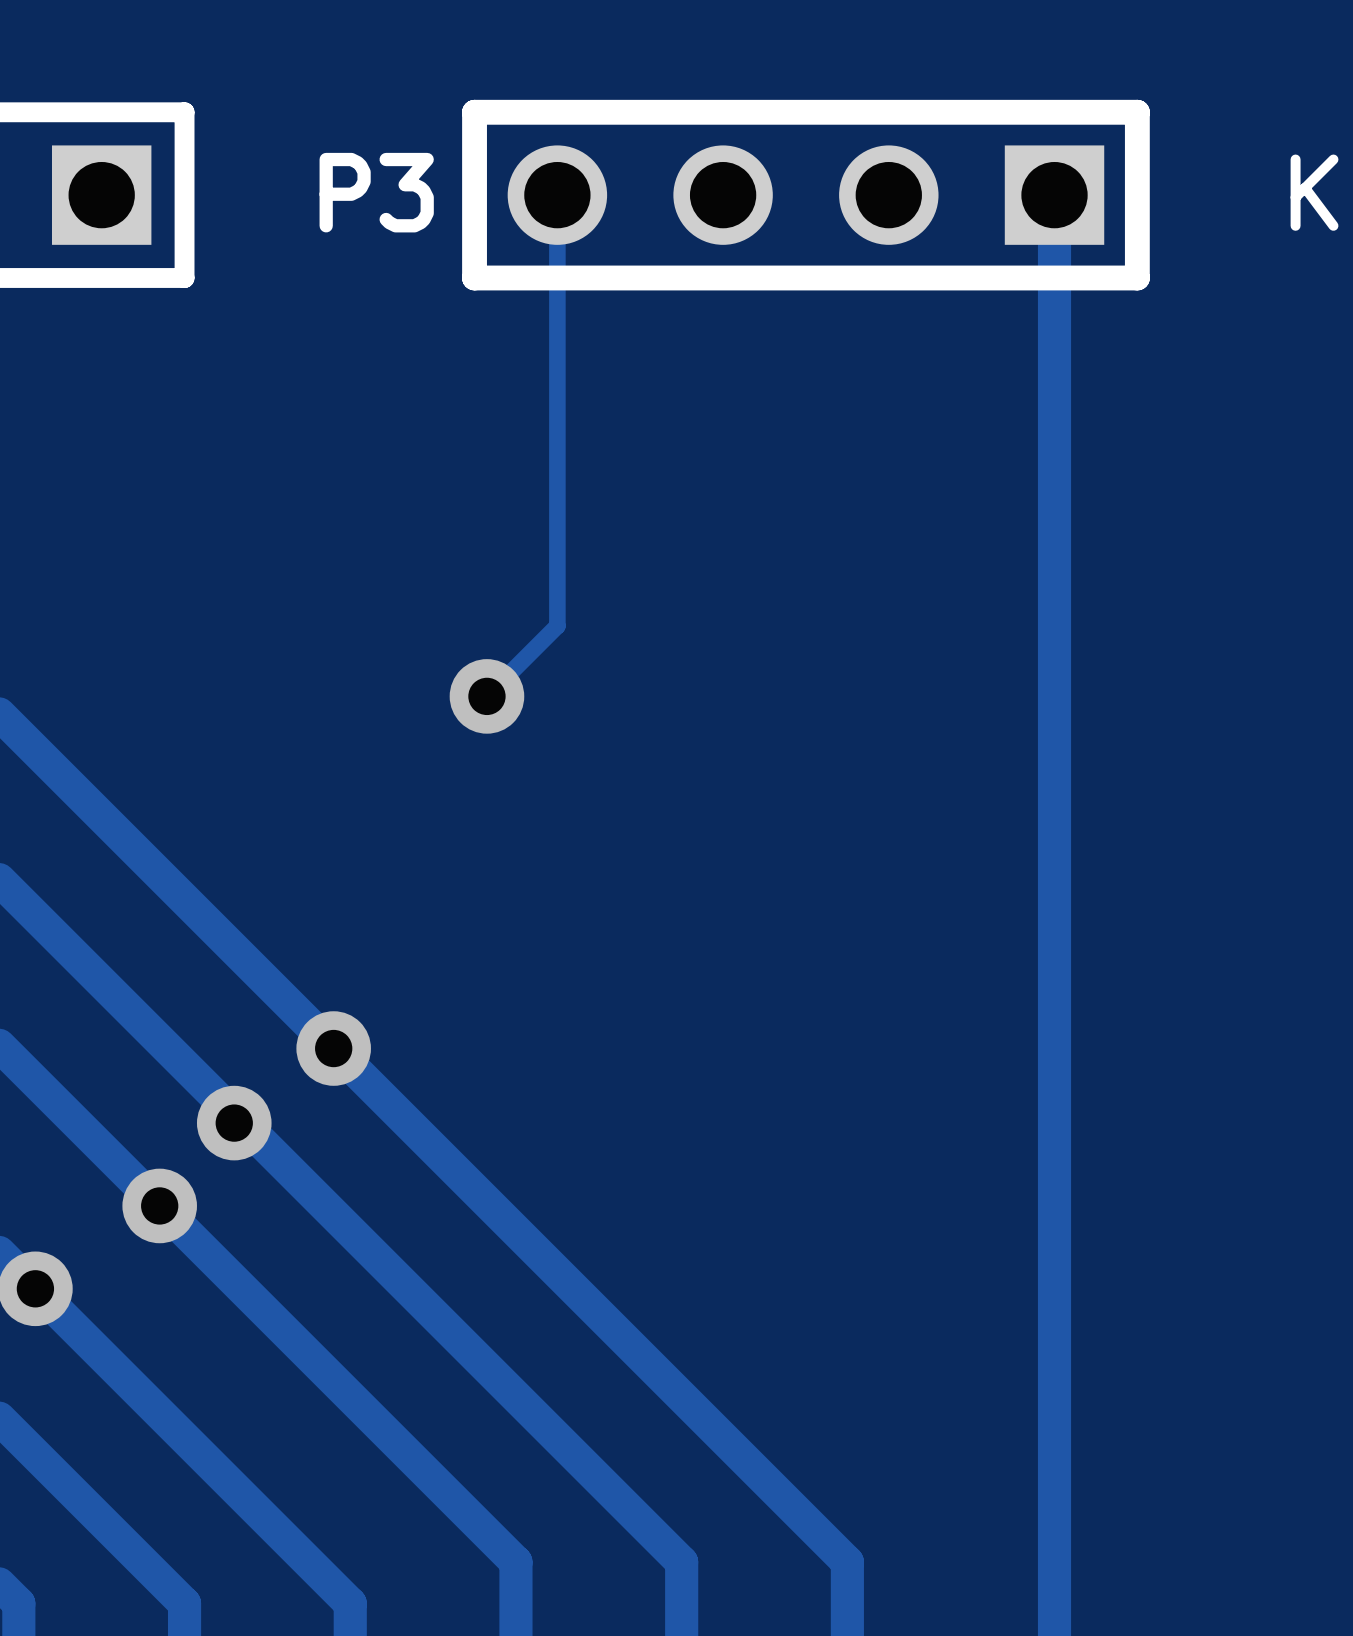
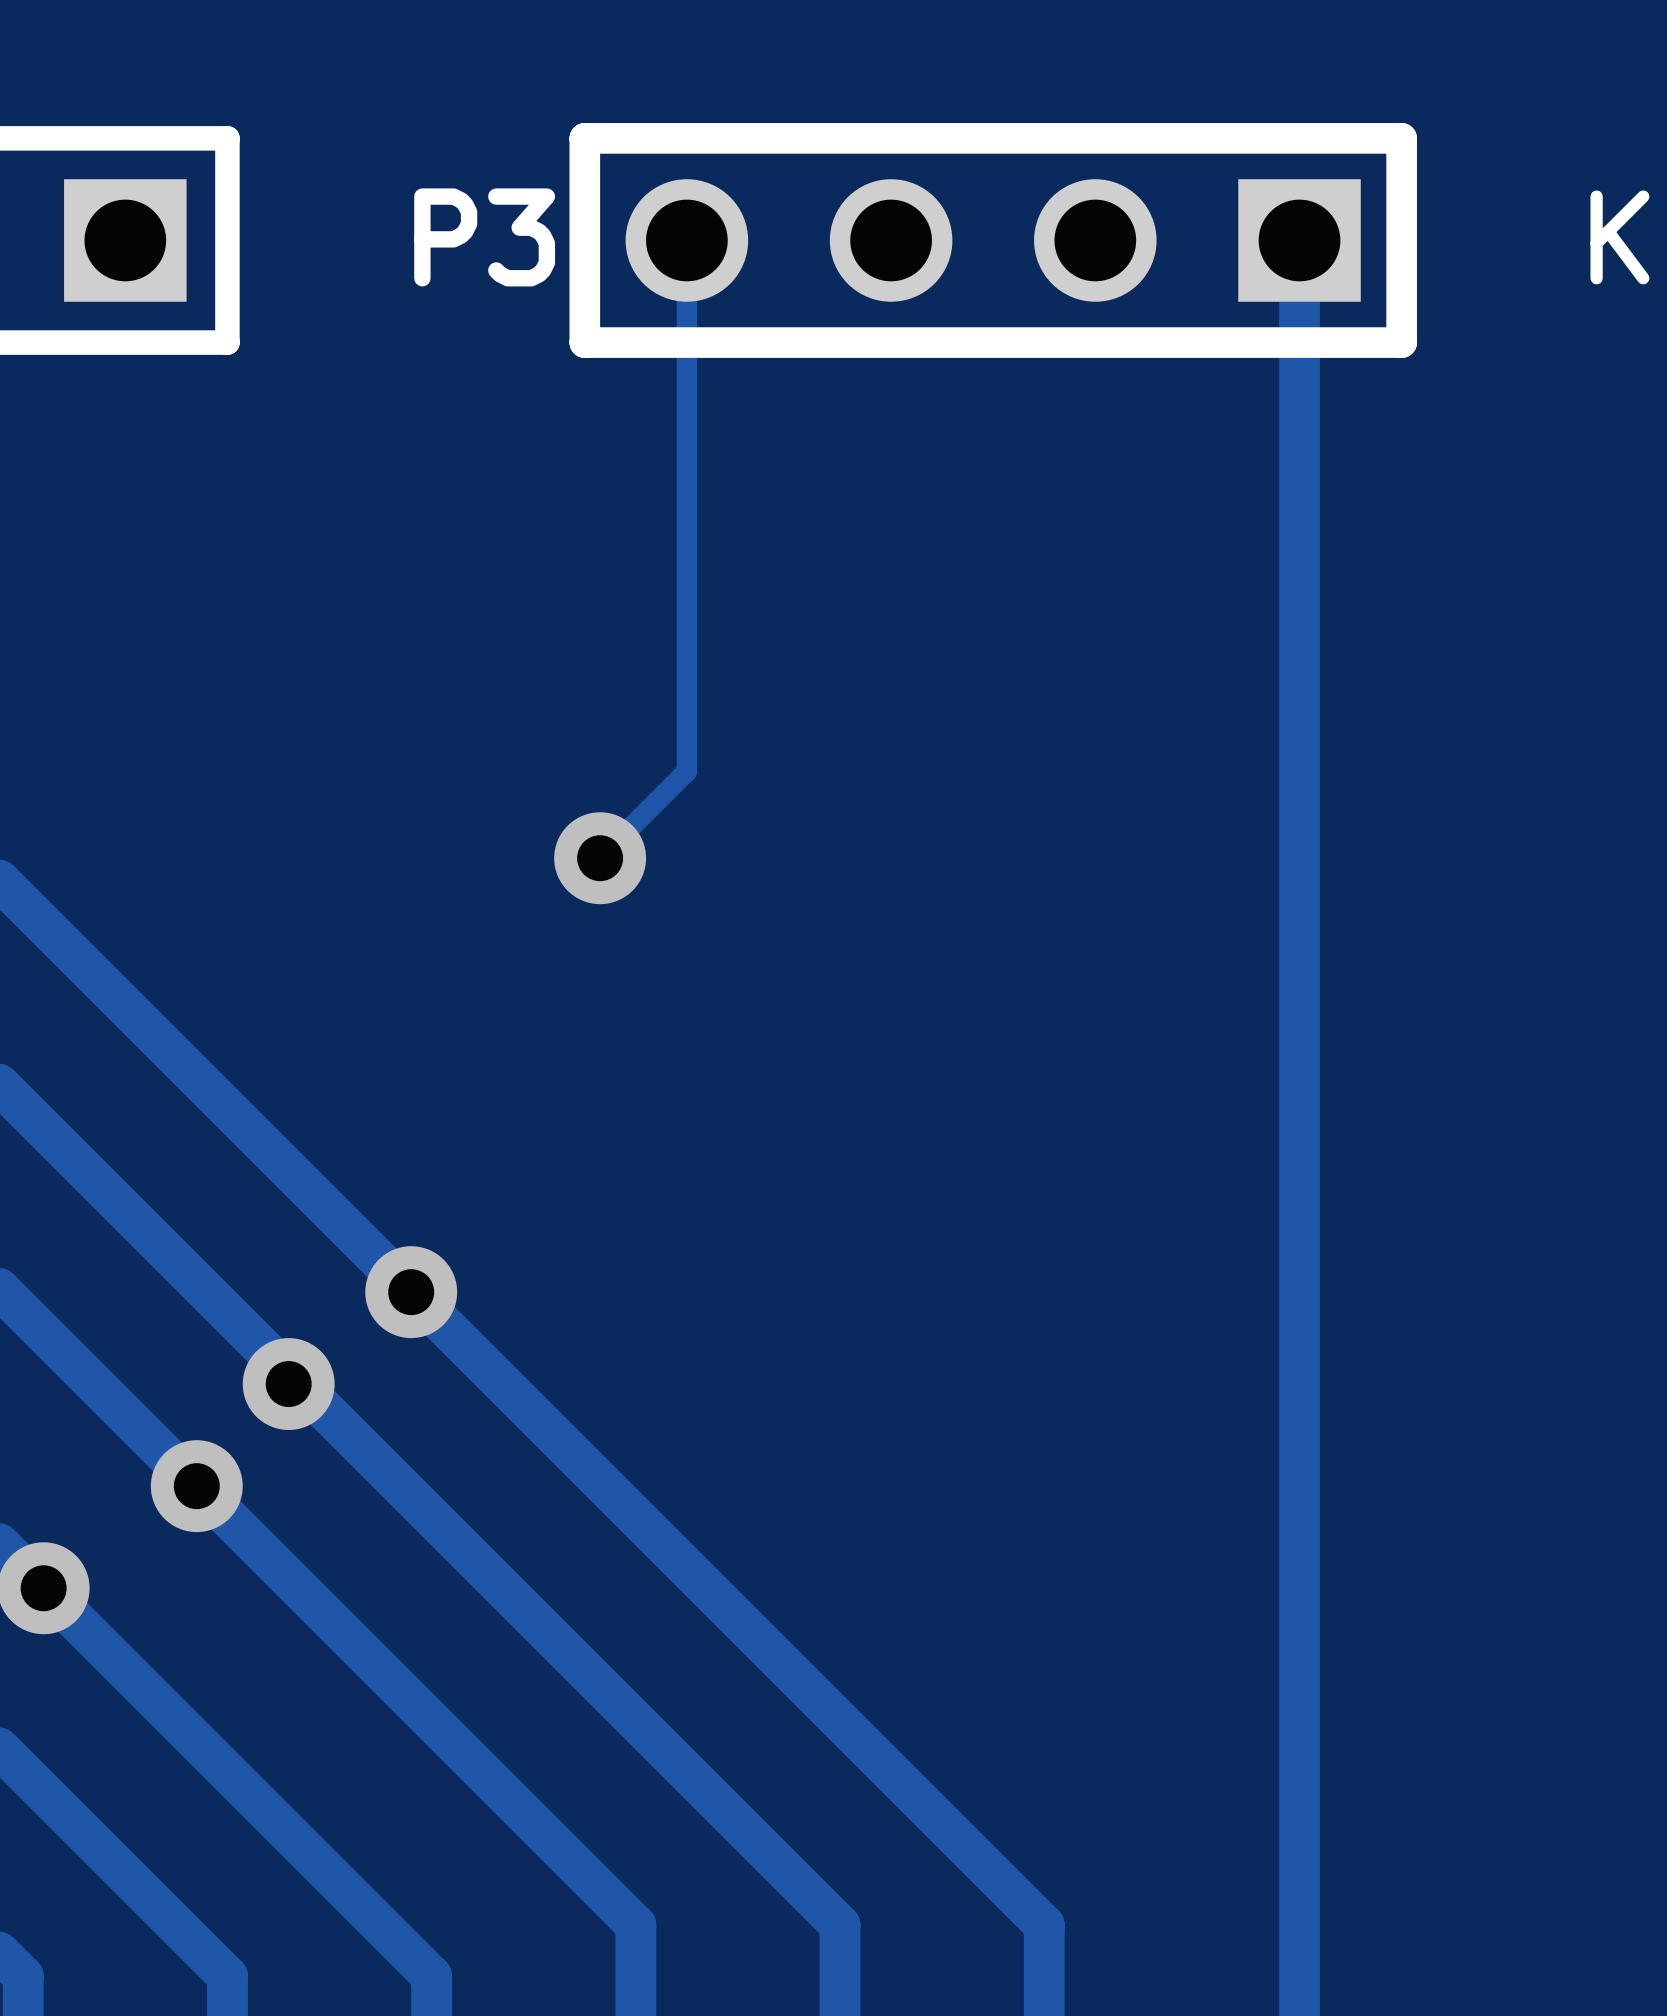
P3 name position: P3 (376, 192) -> P3 (484, 237)

